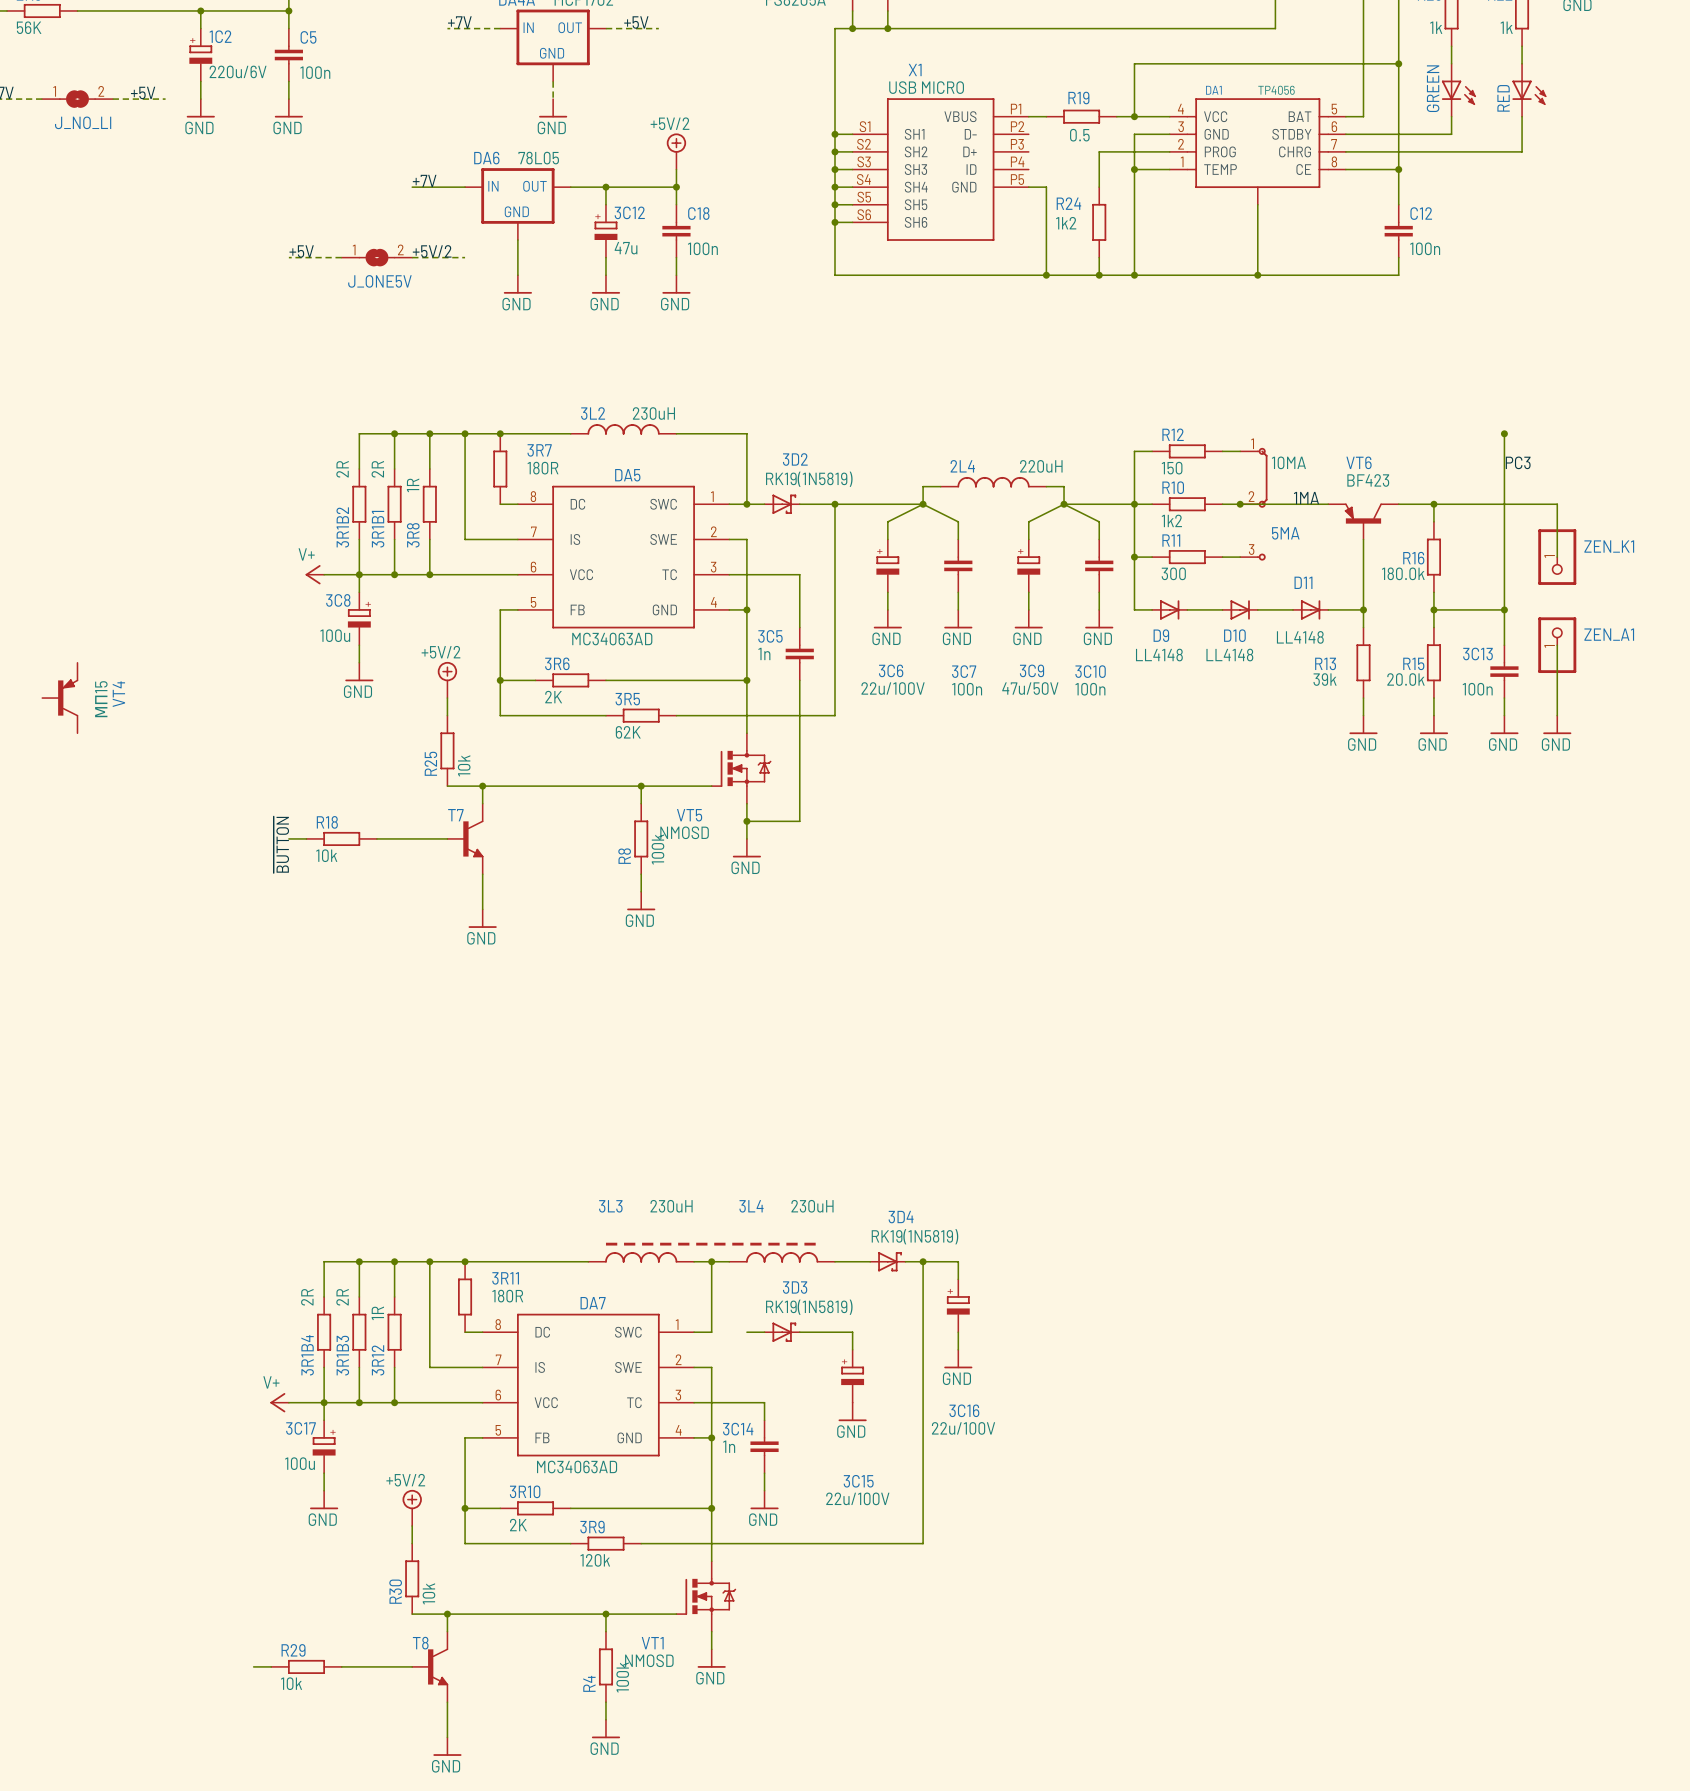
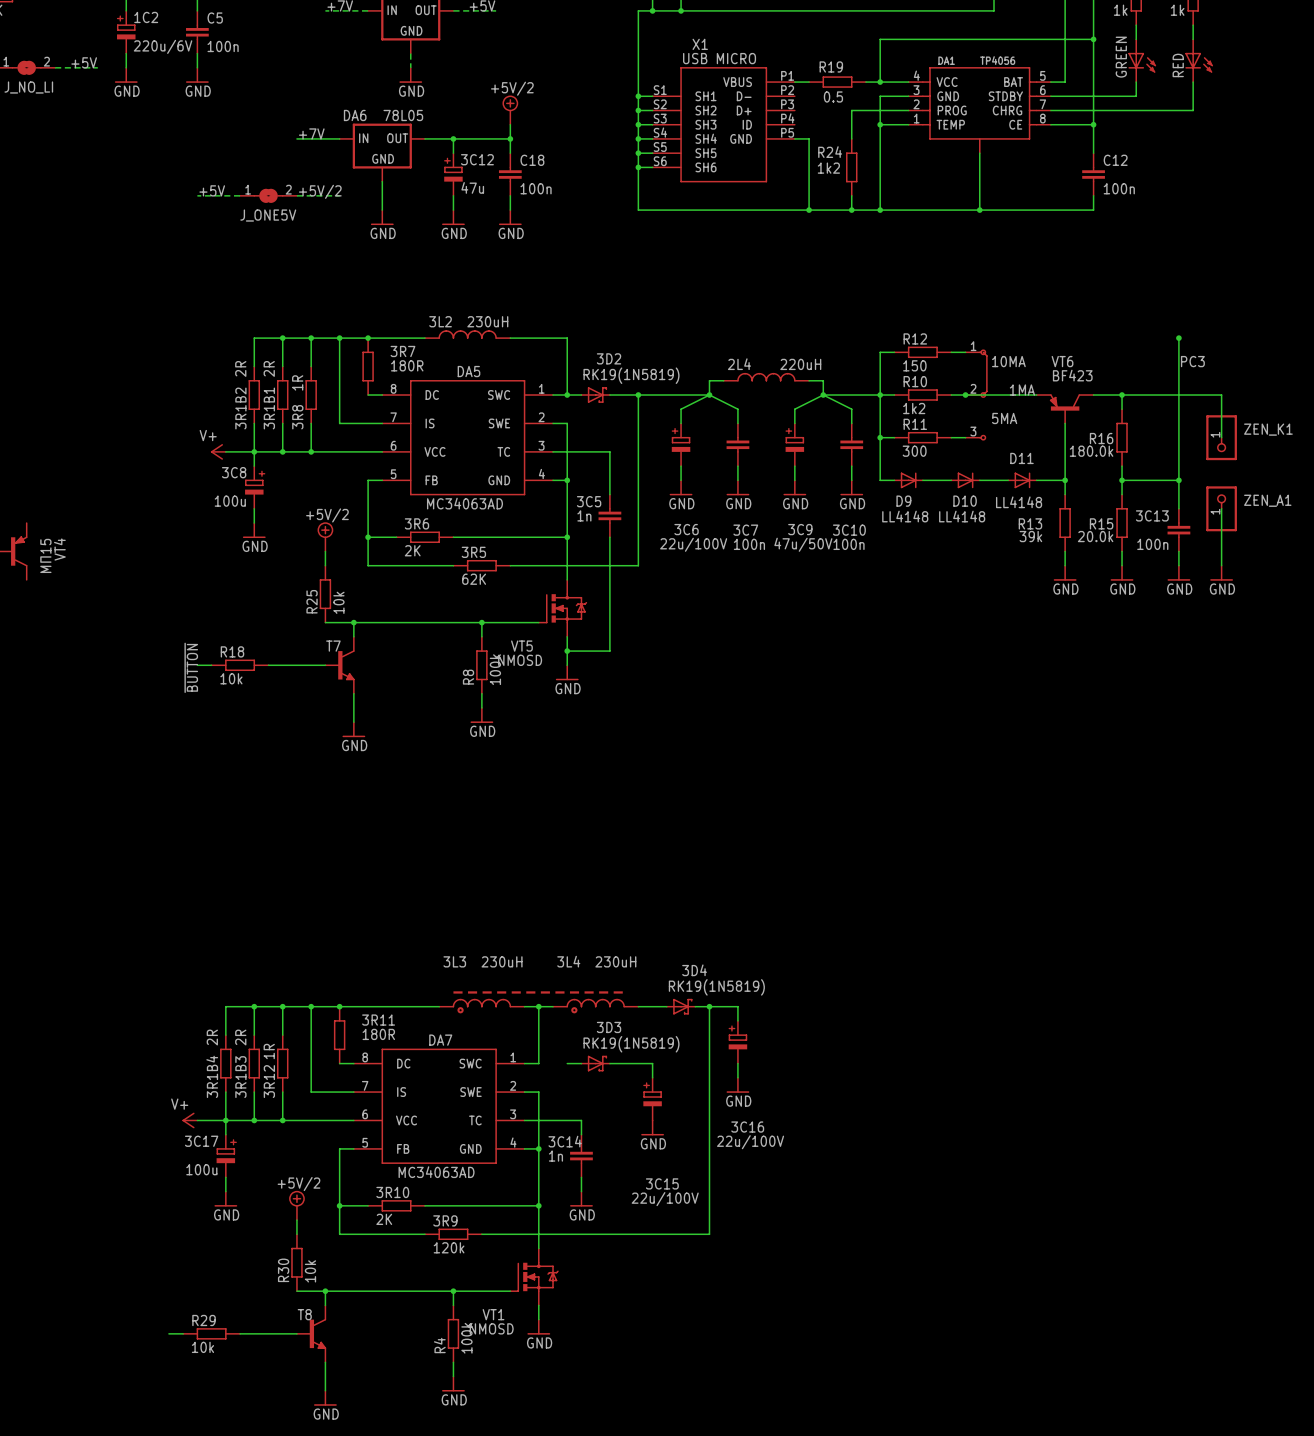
drawing: none -> [457, 1007, 464, 1014]
drawing: none -> [571, 1007, 578, 1014]

